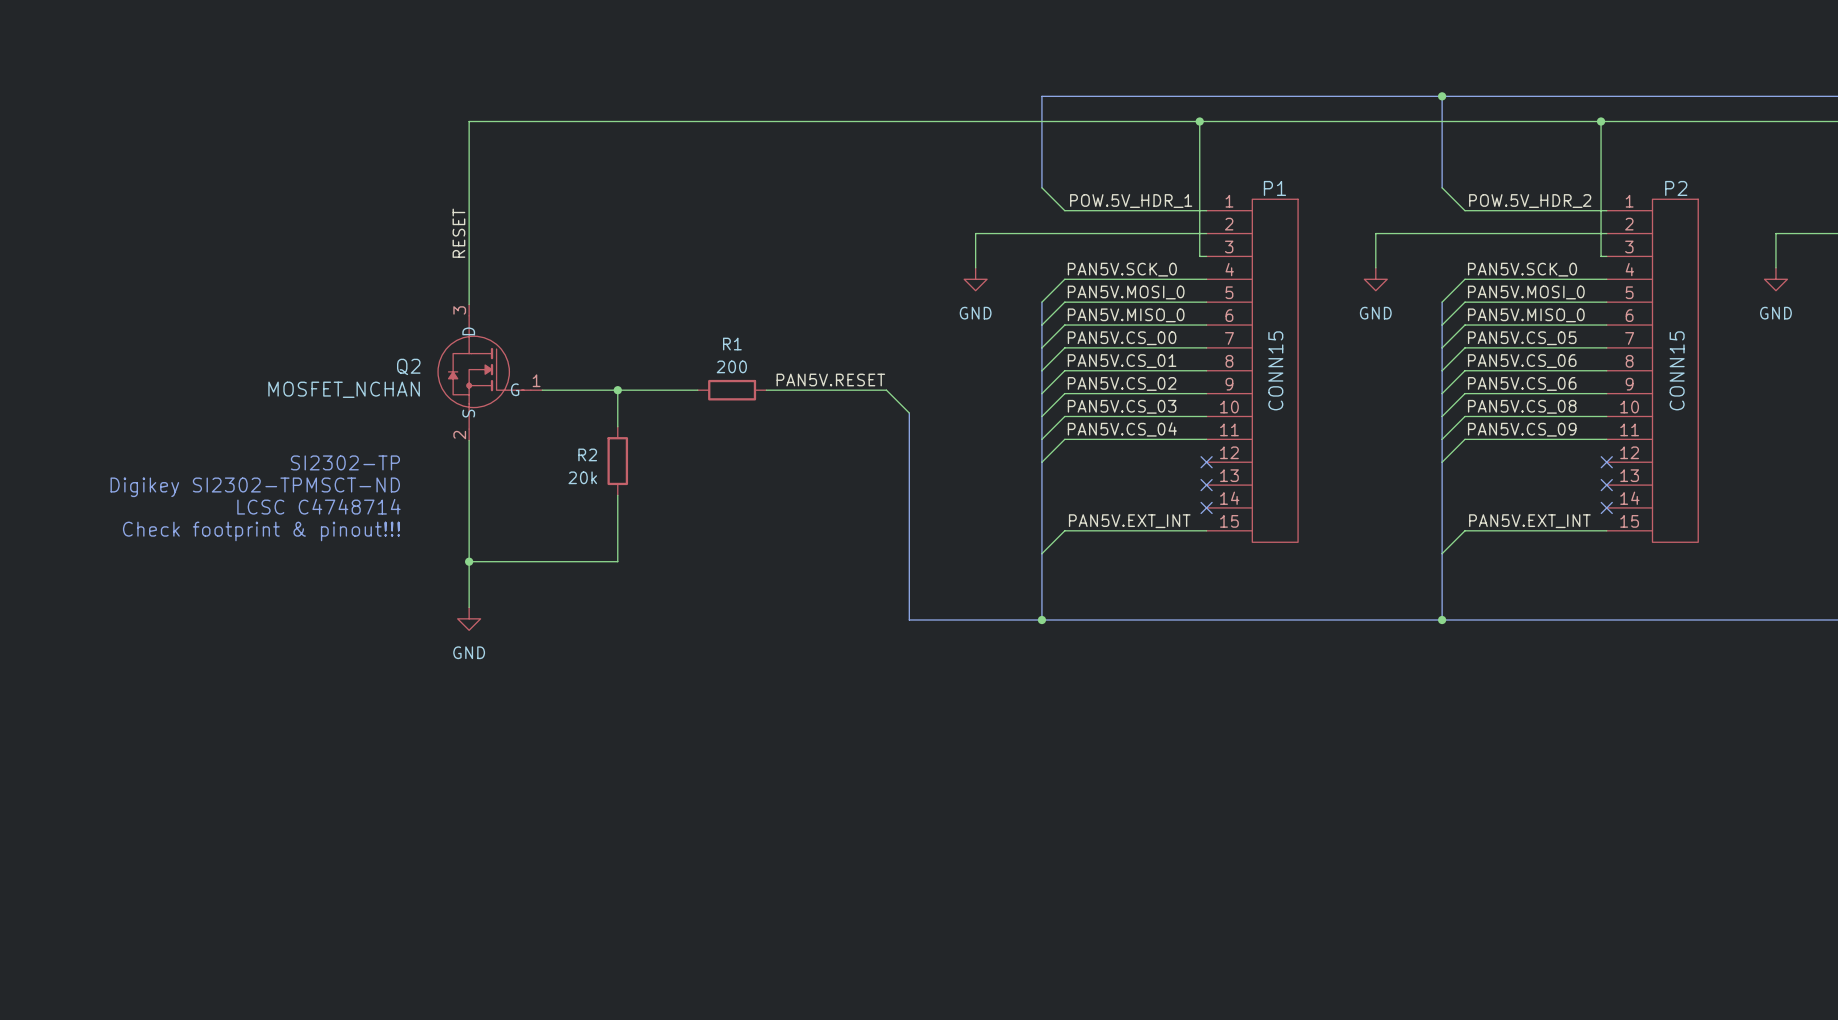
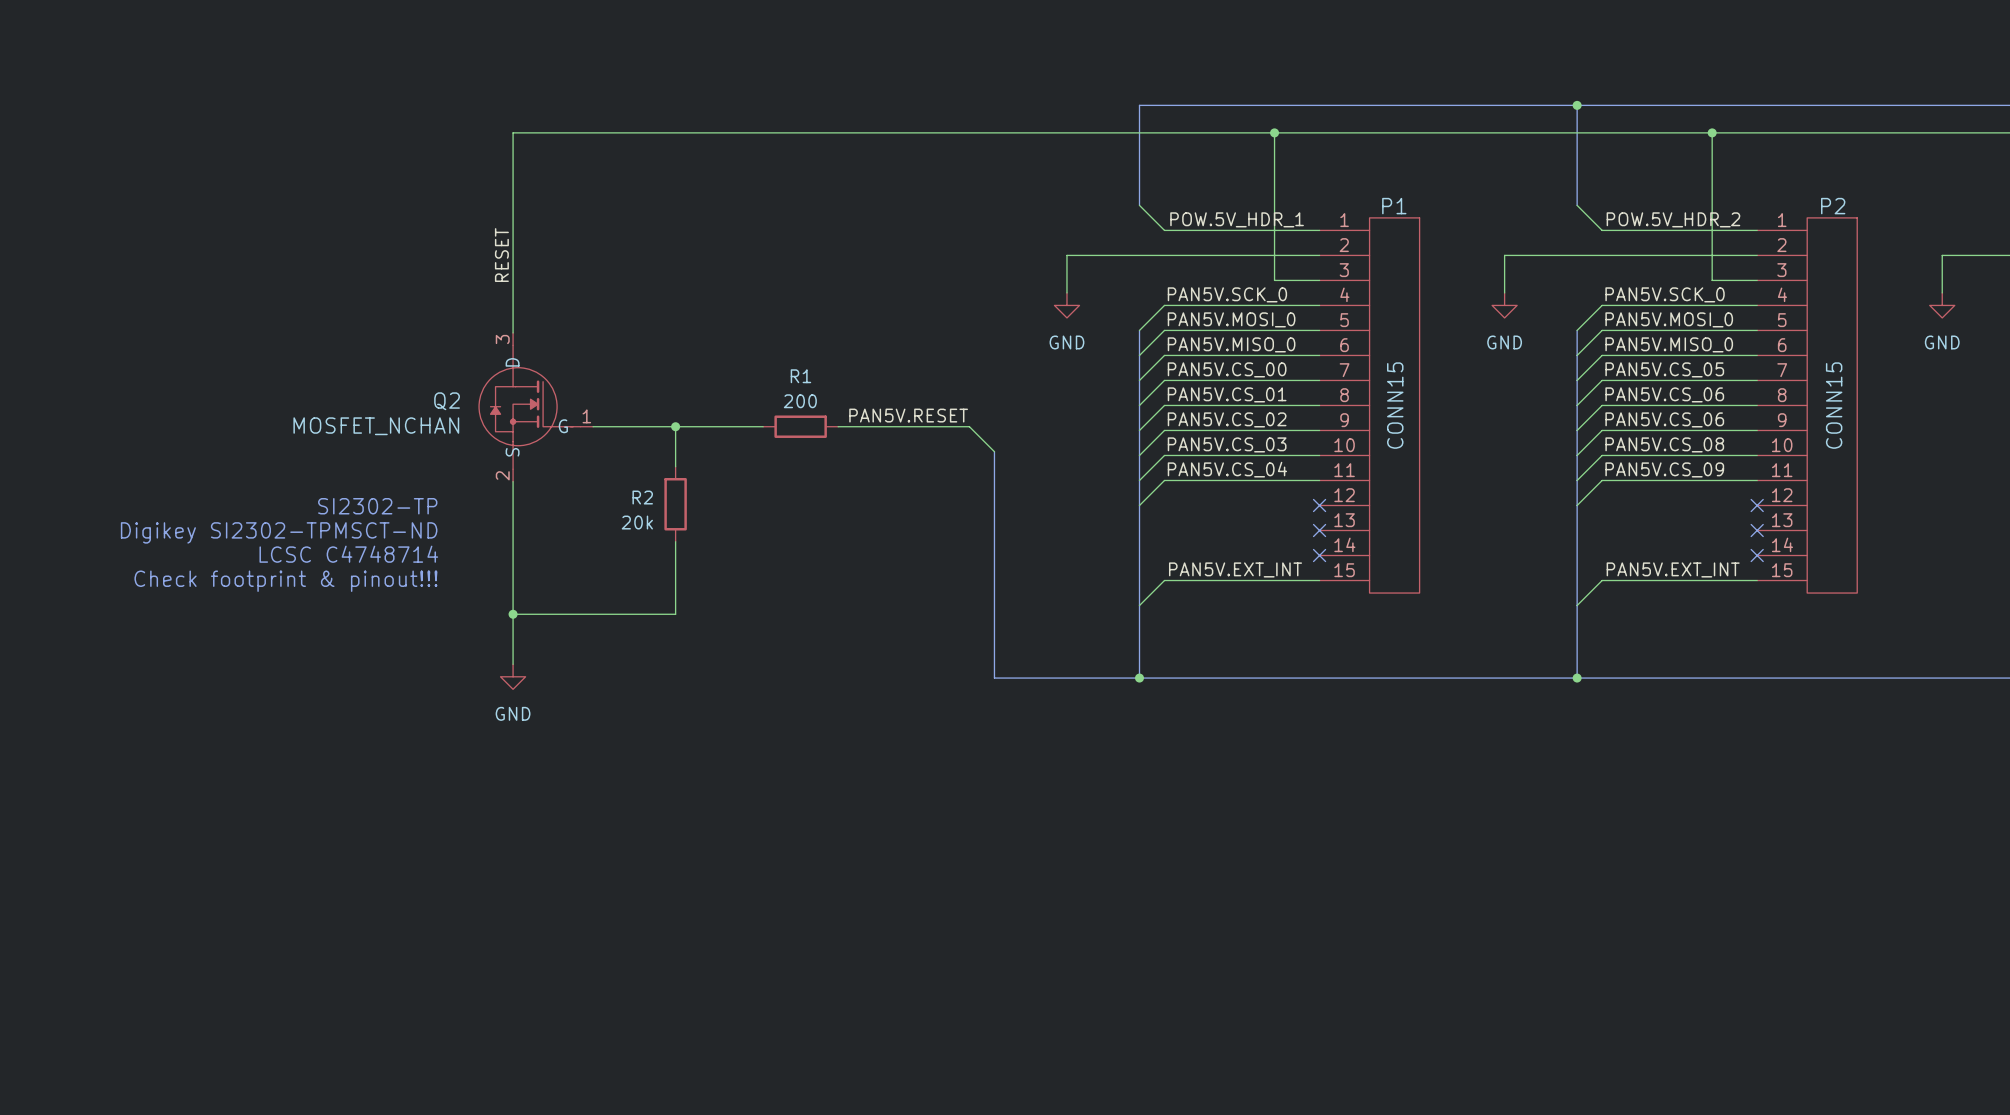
wire: (1199, 121) (1199, 256) -> (1274, 132) (1274, 280) (1312, 280)
junction position: (1199, 121) -> (1274, 132)
wire: (1601, 121) (1601, 256) -> (1712, 132) (1712, 280) (1750, 280)
junction position: (1601, 121) -> (1712, 132)

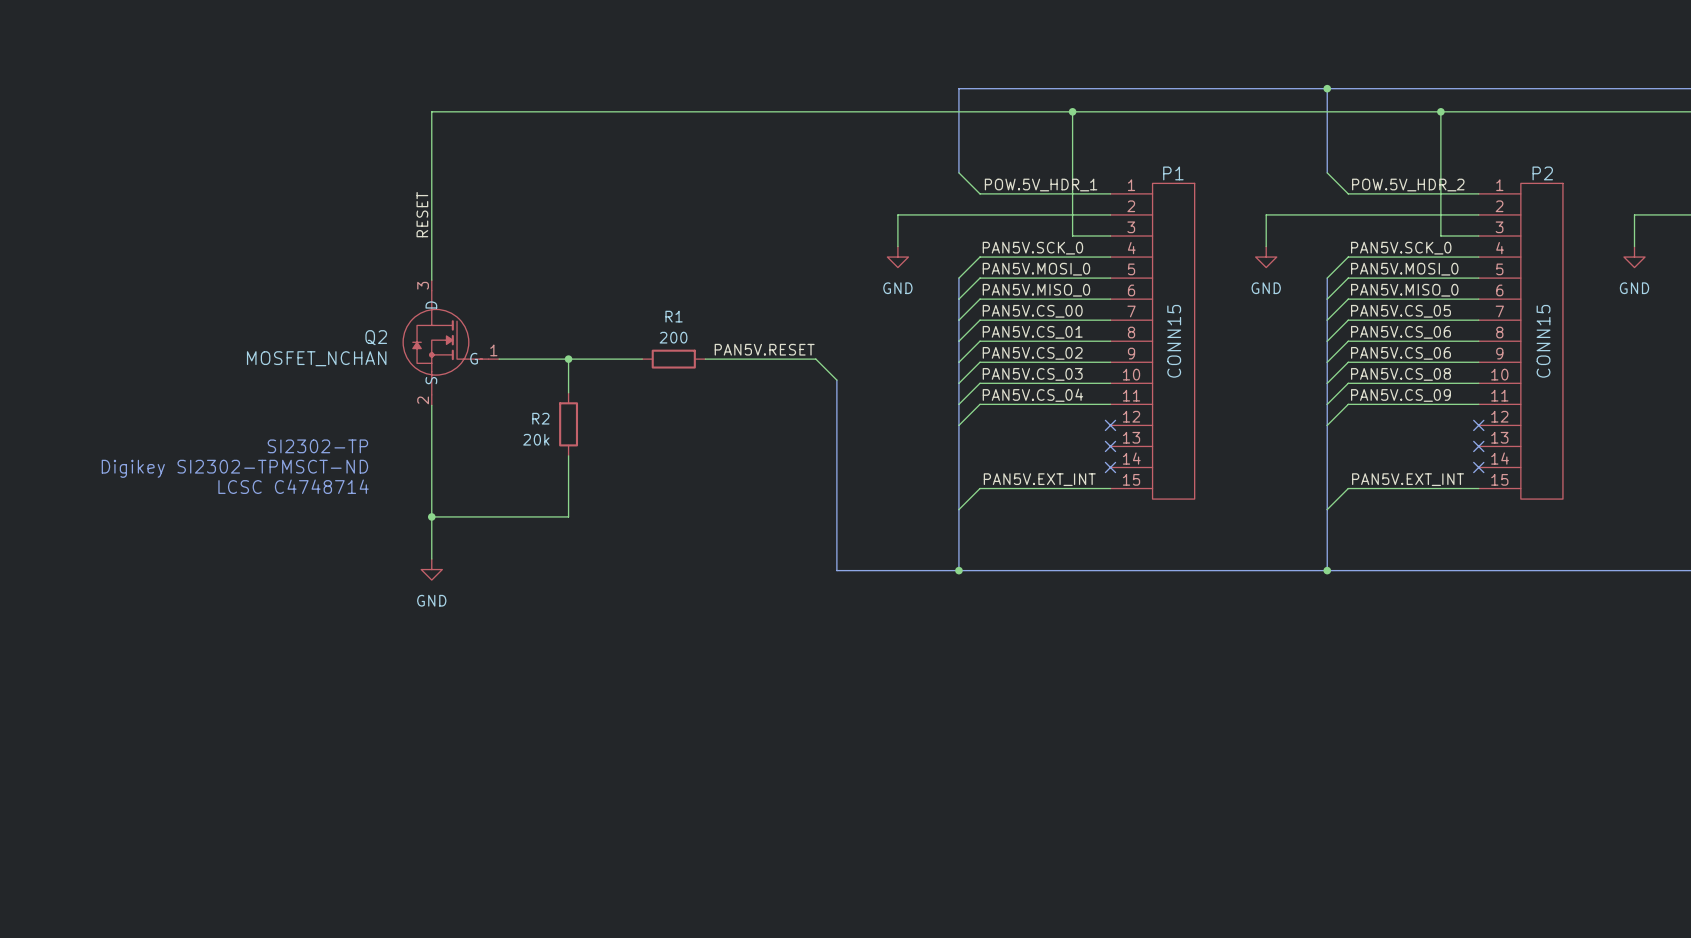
text: SI2302-TP (377, 506) -> none
text: Digikey SI2302-TPMSCT-ND (279, 532) -> SI2302-TP (317, 446)
text: LCSC C4748714 (348, 554) -> Digikey SI2302-TPMSCT-ND (234, 468)
text: Check footprint & pinout!!! (285, 581) -> LCSC C4748714 (293, 486)

